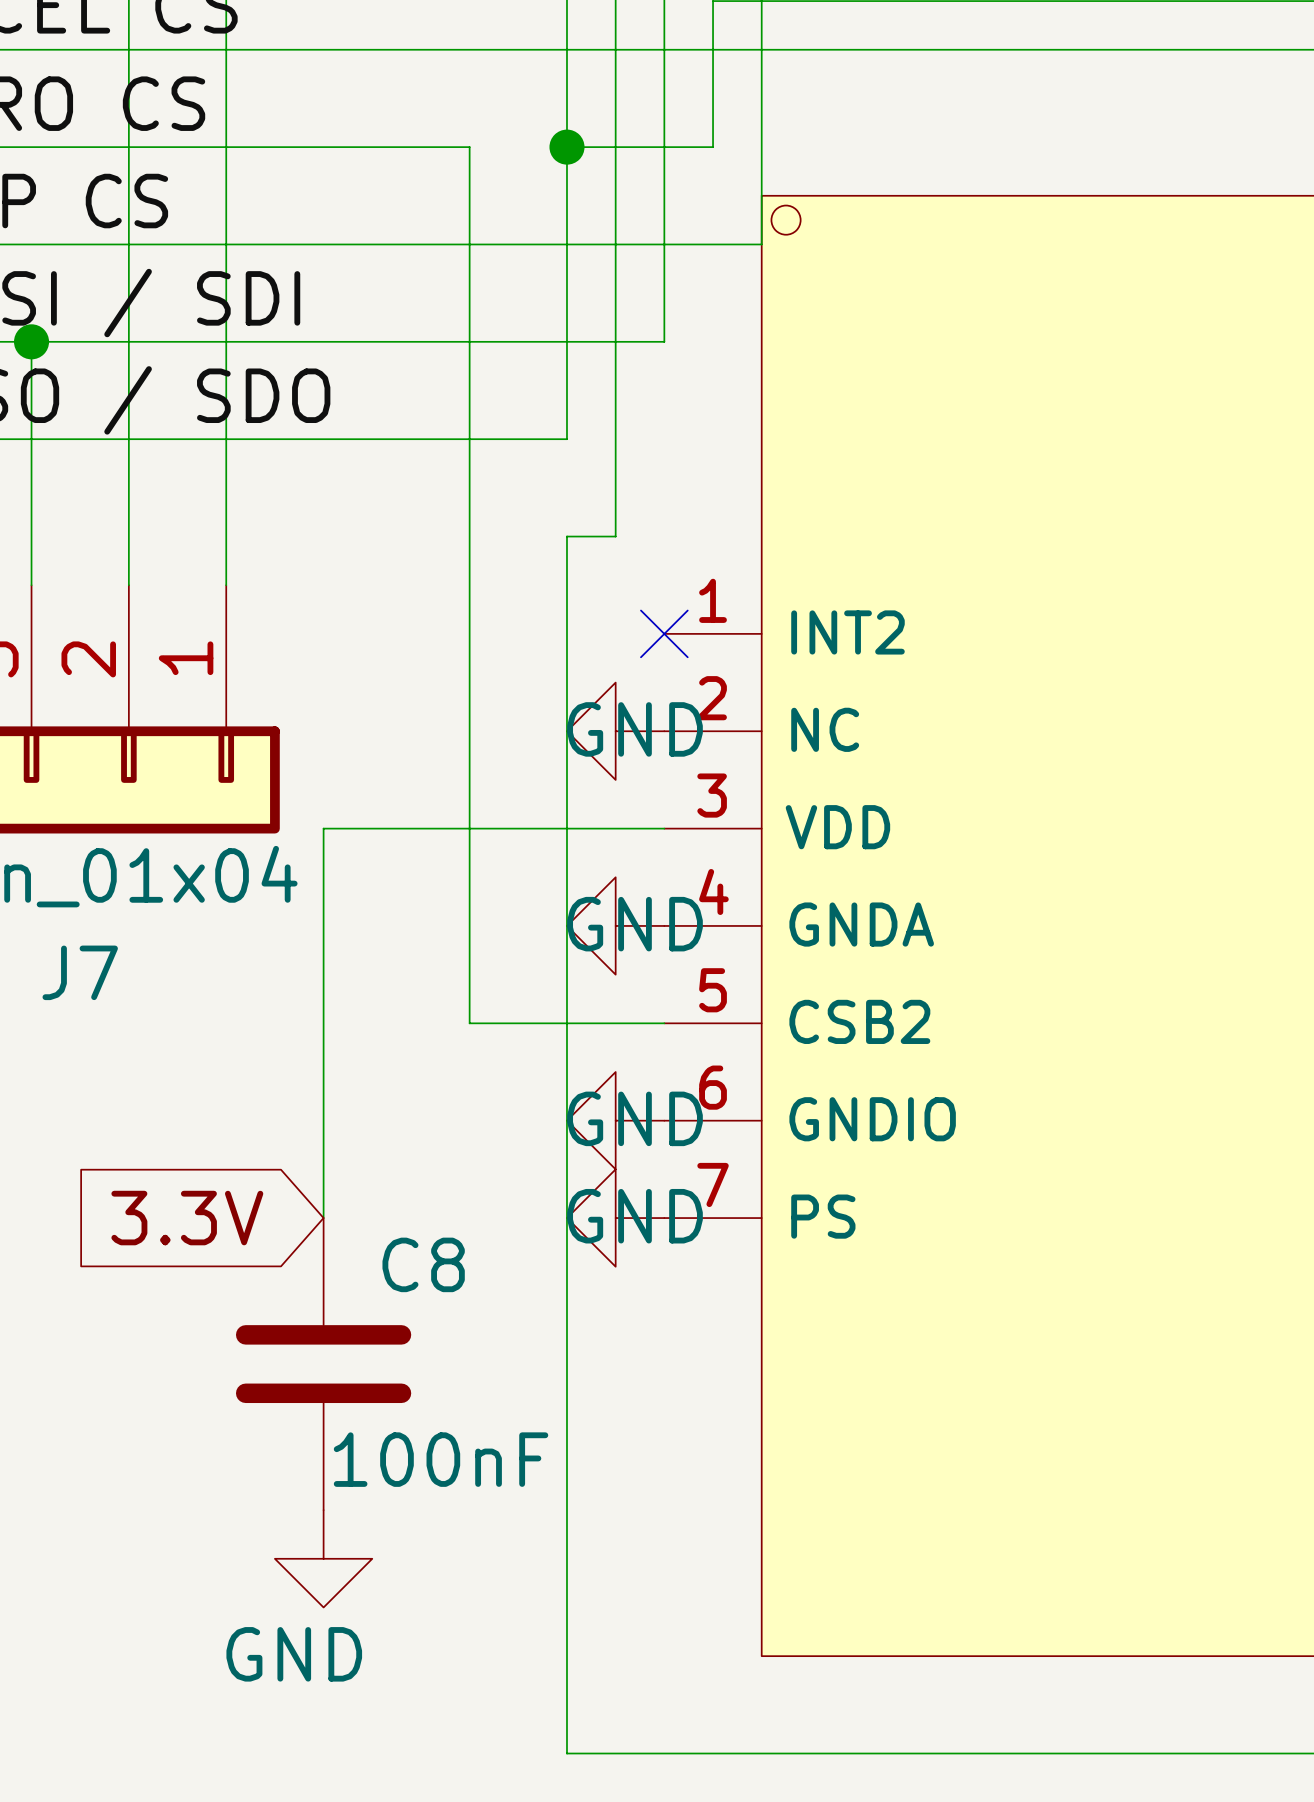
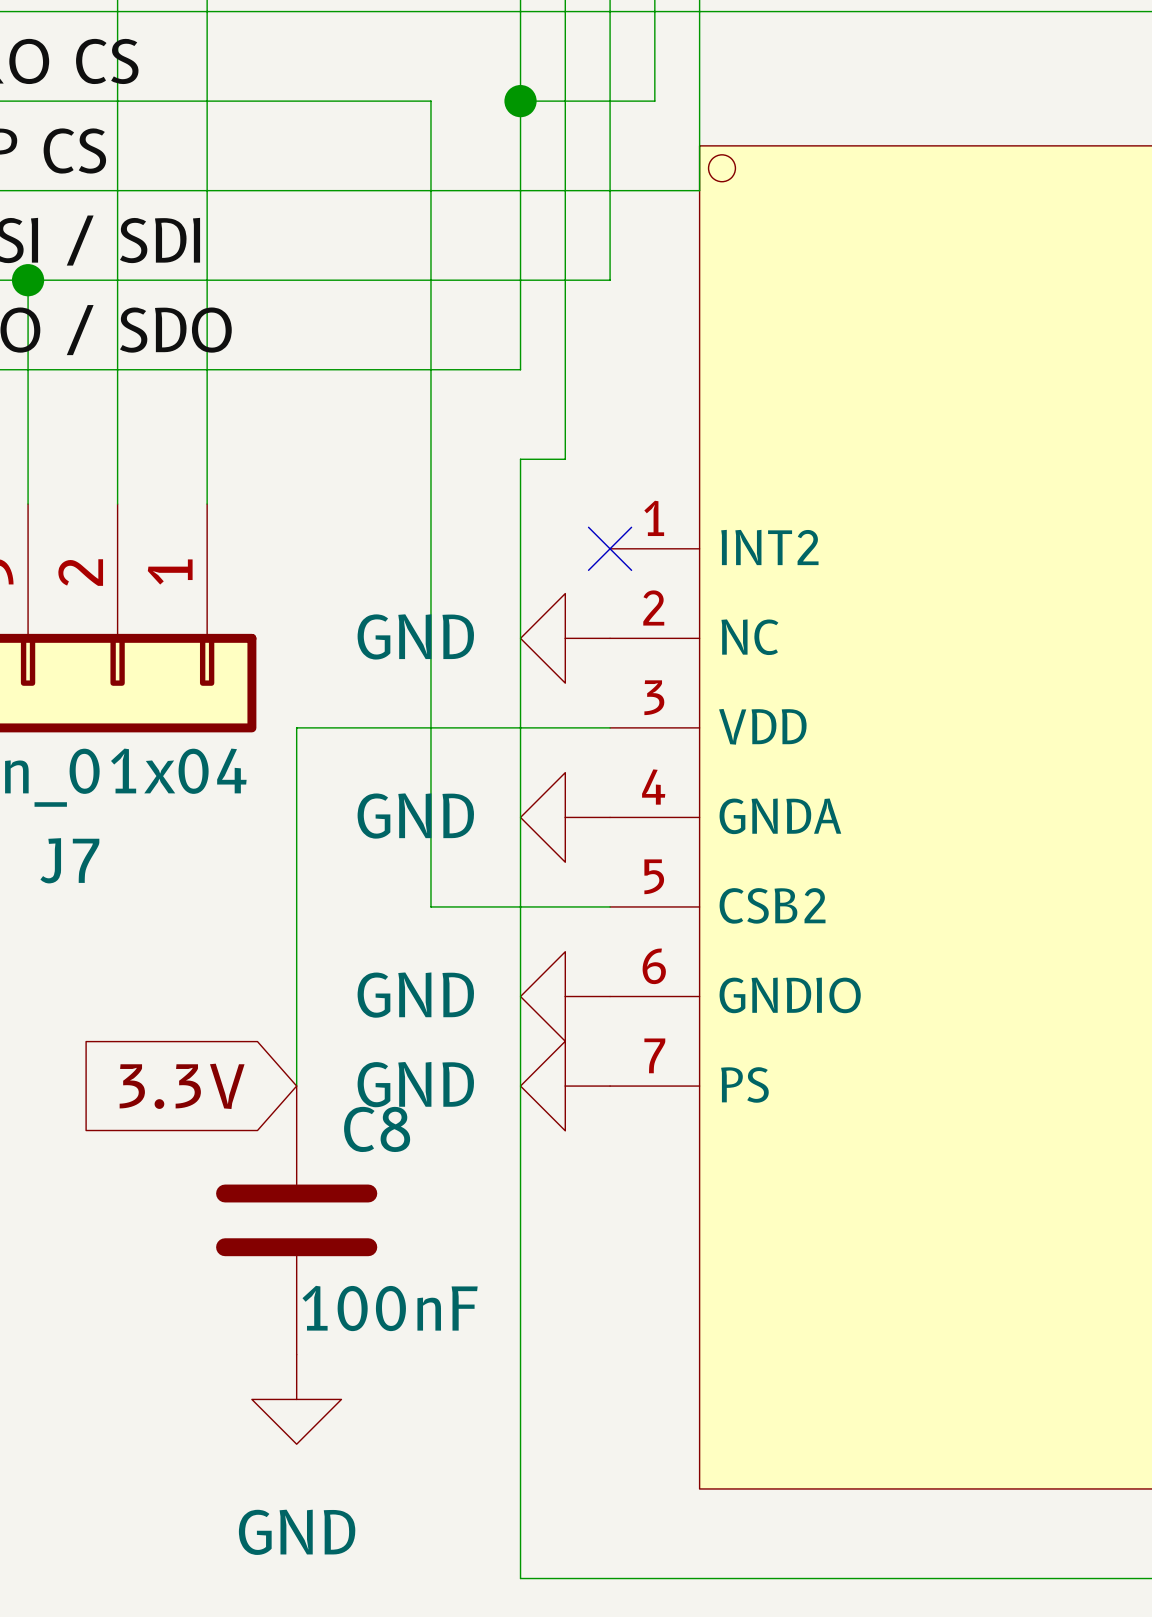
power symbol text position: GND (635, 729) -> GND (415, 636)
power symbol text position: GND (635, 924) -> GND (415, 816)
power symbol text position: GND (635, 1118) -> GND (415, 995)
power symbol text position: GND (635, 1216) -> GND (415, 1084)
power symbol text position: GND (294, 1654) -> GND (297, 1532)

